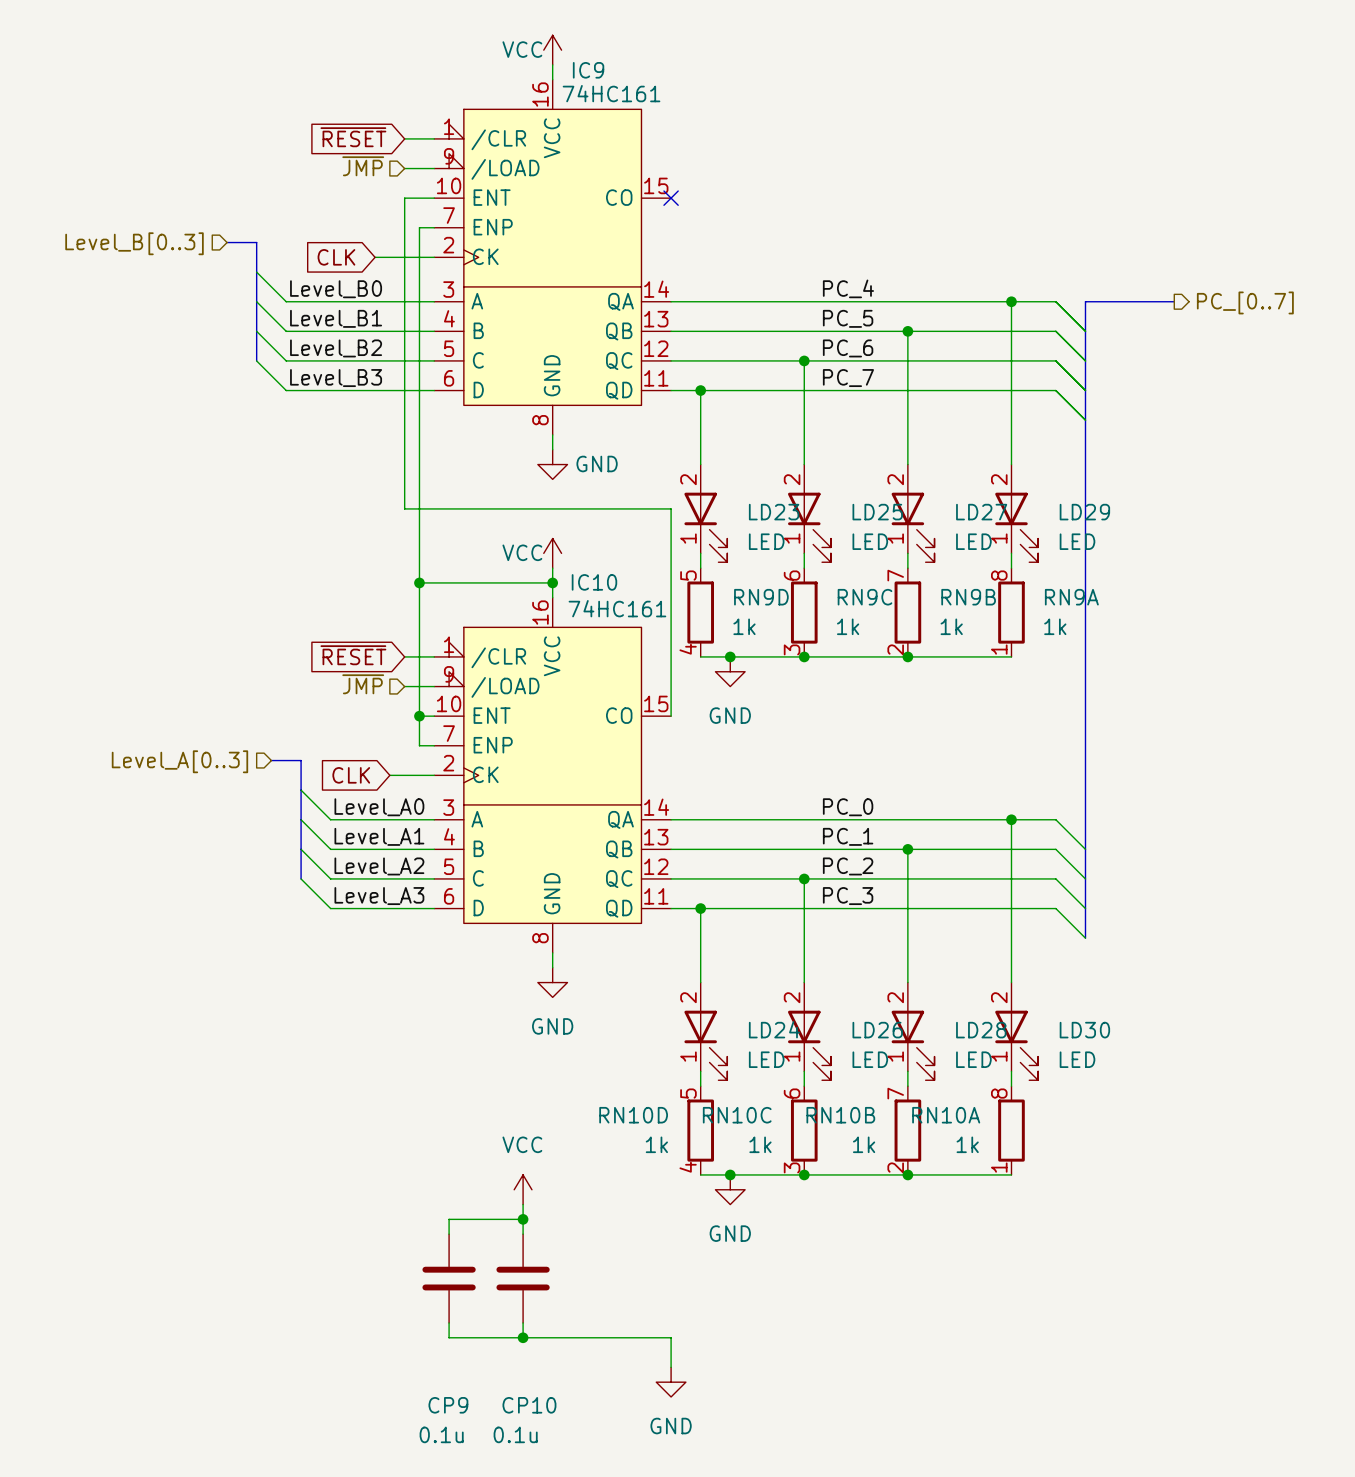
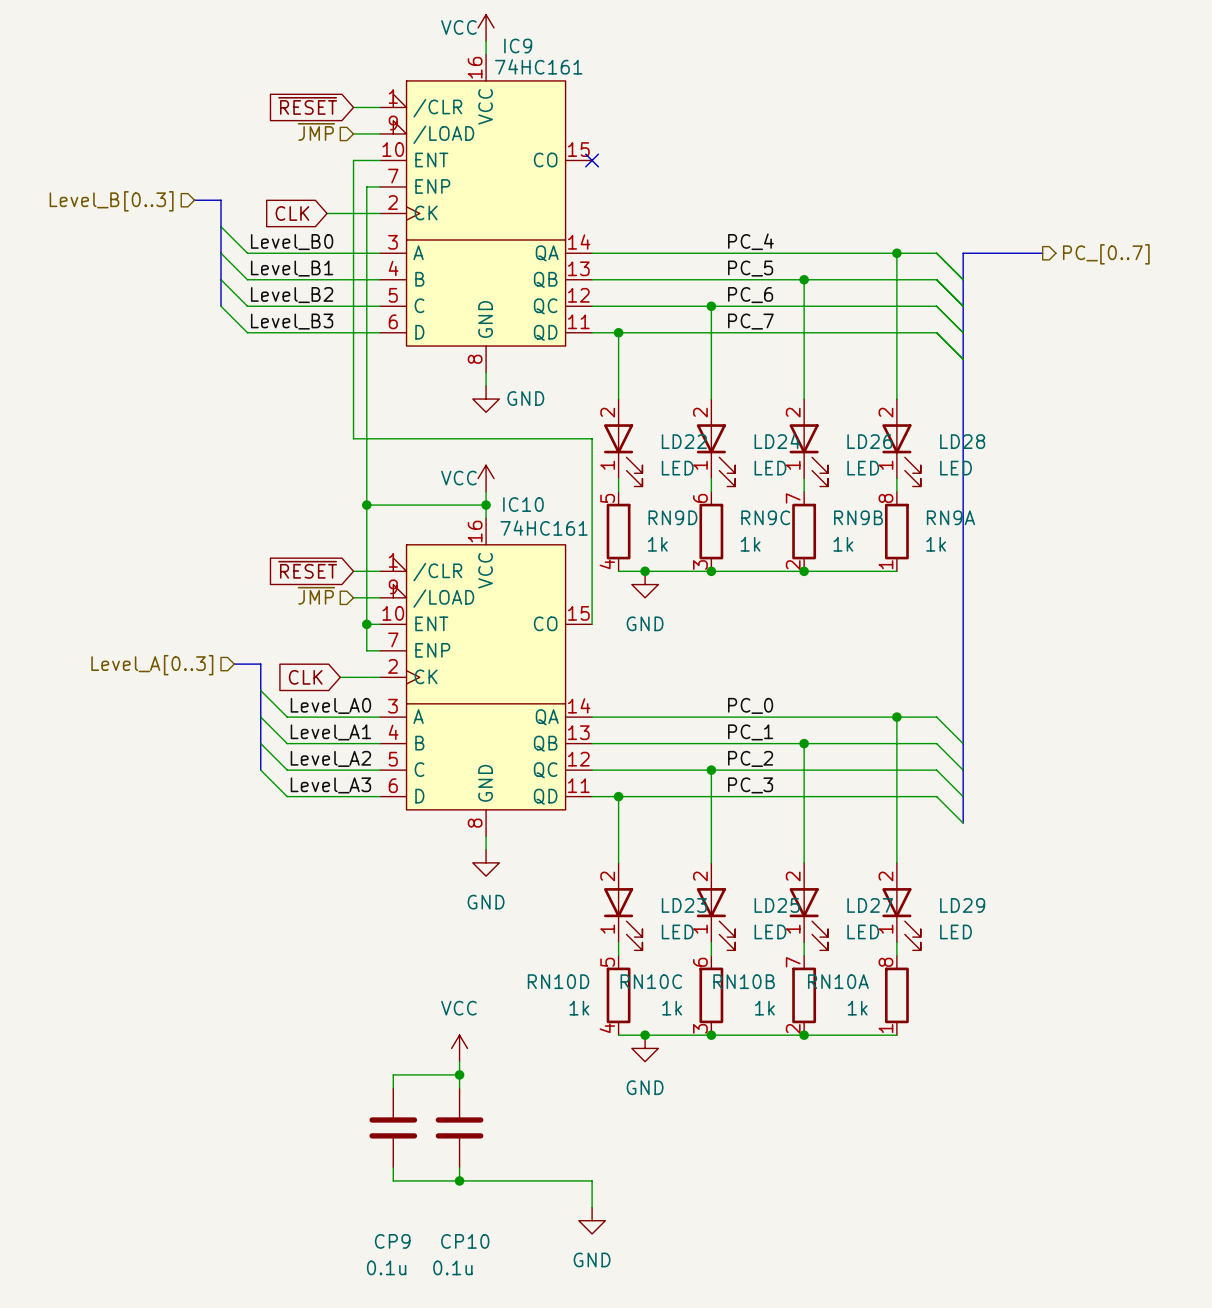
LD23 name: LD23 (774, 512) -> LD22 (684, 441)
LD25 name: LD25 (877, 512) -> LD24 (777, 441)
LD27 name: LD27 (981, 512) -> LD26 (869, 441)
LD29 name: LD29 (1084, 512) -> LD28 (962, 441)
LD24 name: LD24 (774, 1029) -> LD23 (684, 905)
LD26 name: LD26 (877, 1030) -> LD25 (777, 905)
LD28 name: LD28 (981, 1030) -> LD27 (870, 905)
LD30 name: LD30 (1084, 1030) -> LD29 (962, 905)

